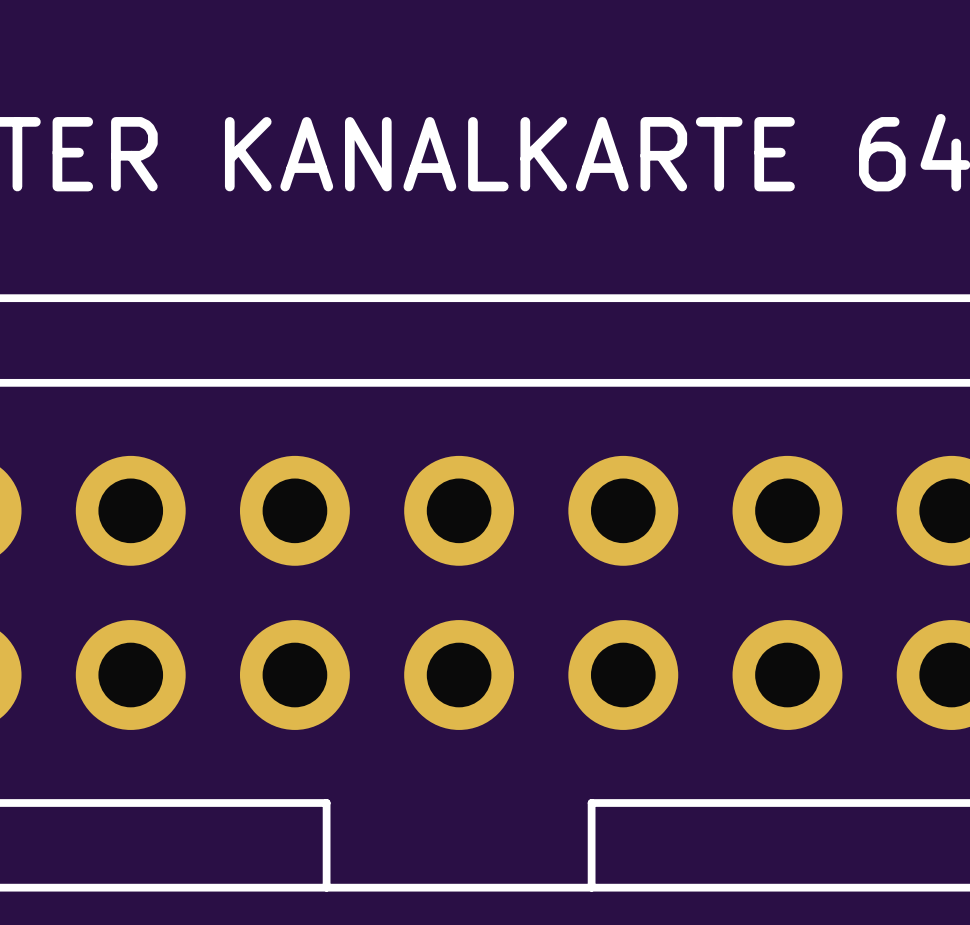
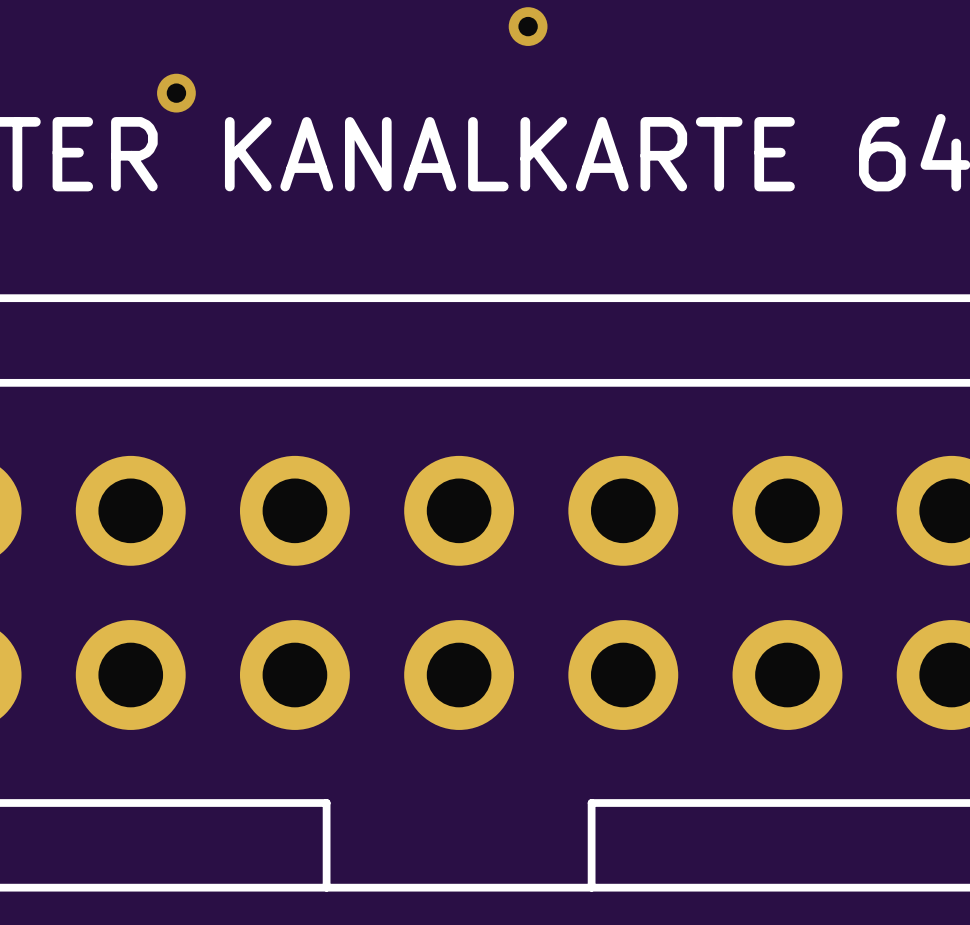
via: none -> (528, 26)
via: none -> (176, 93)

